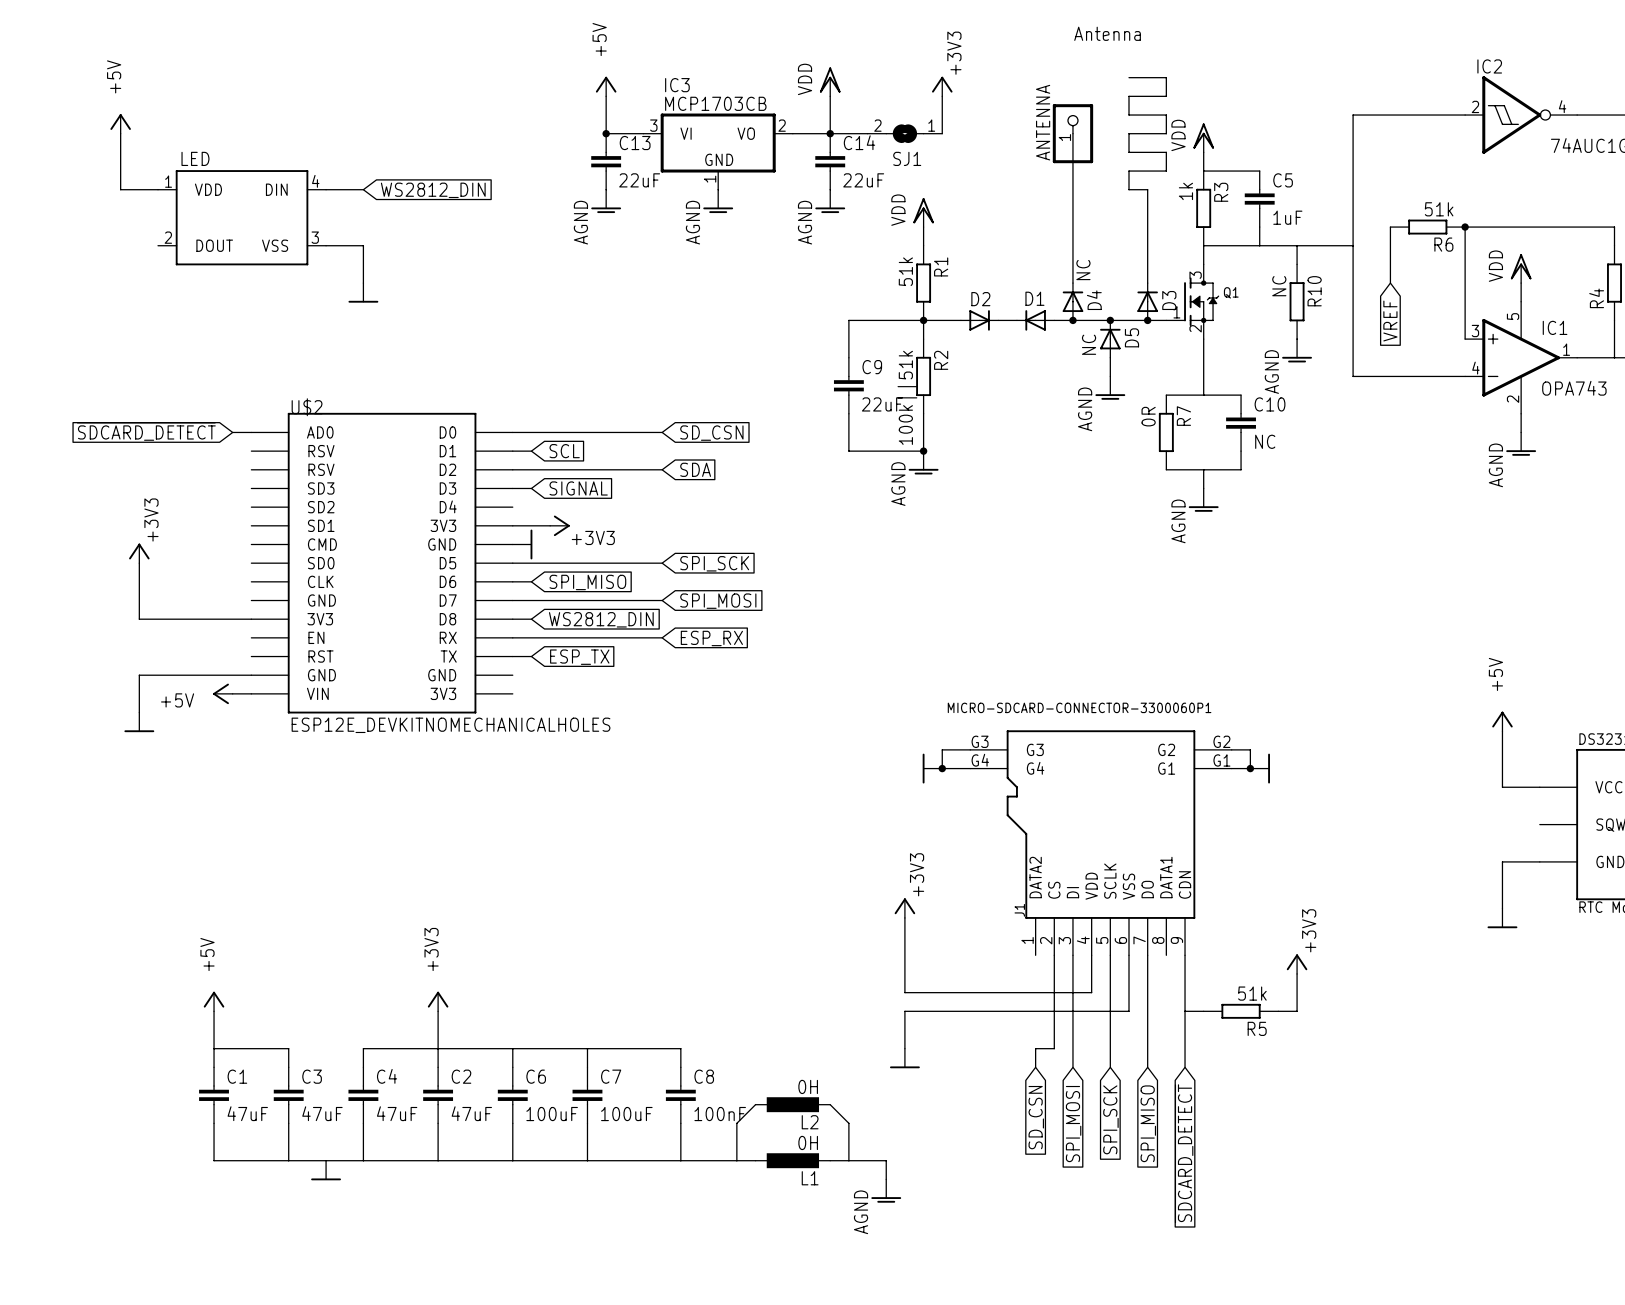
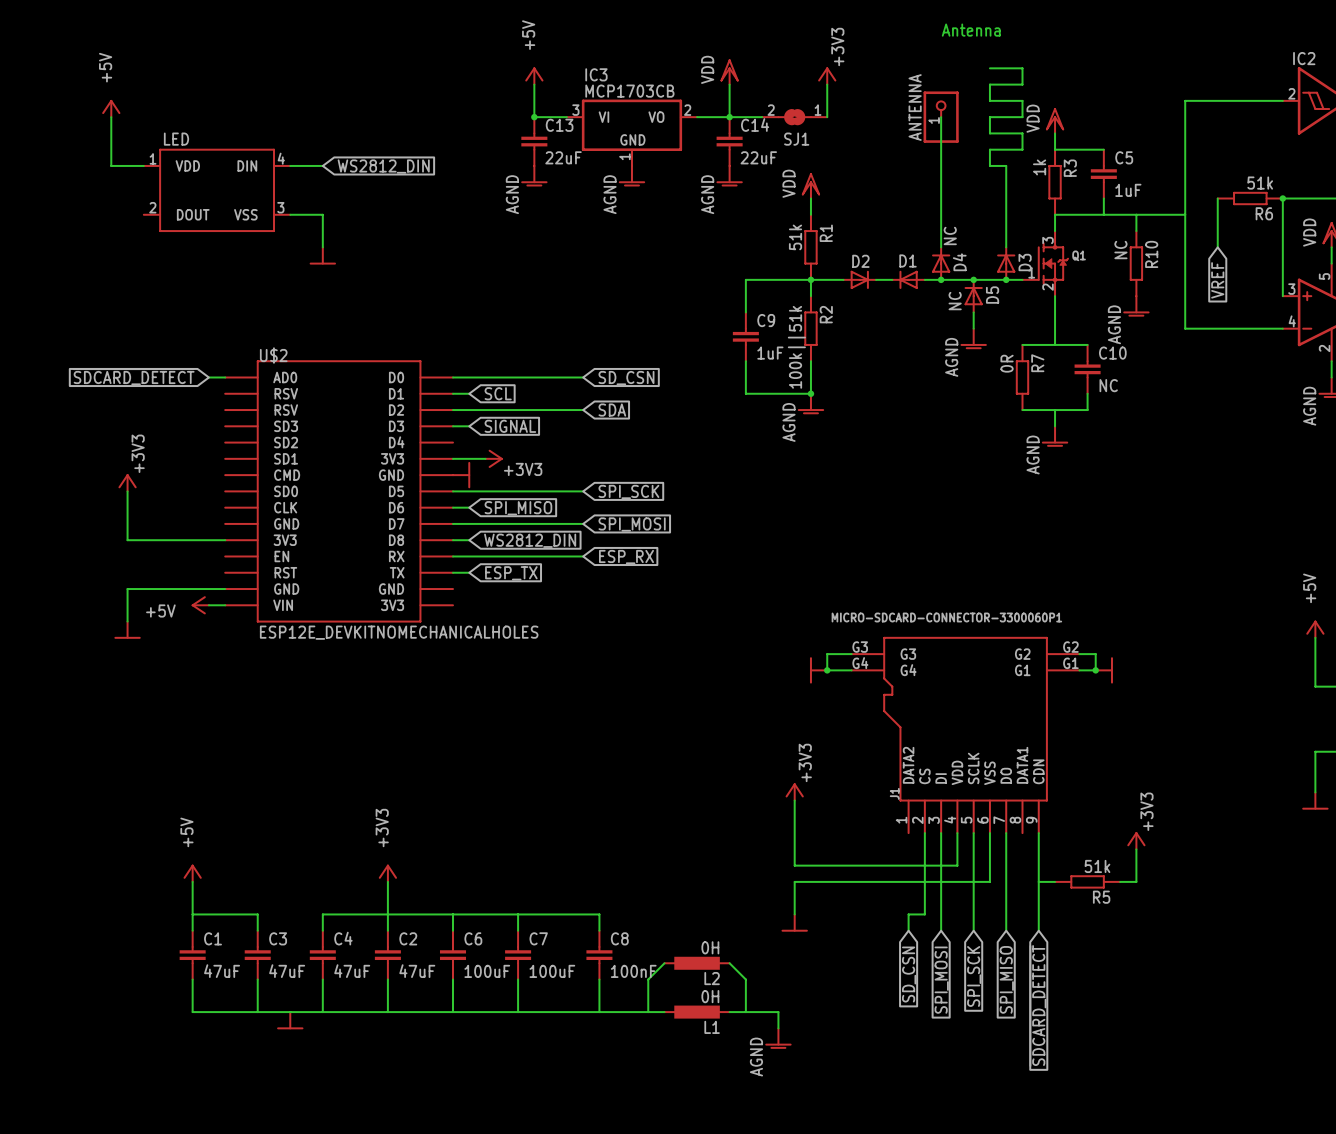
C9 value: 22uF (882, 404) -> 1uF (770, 353)

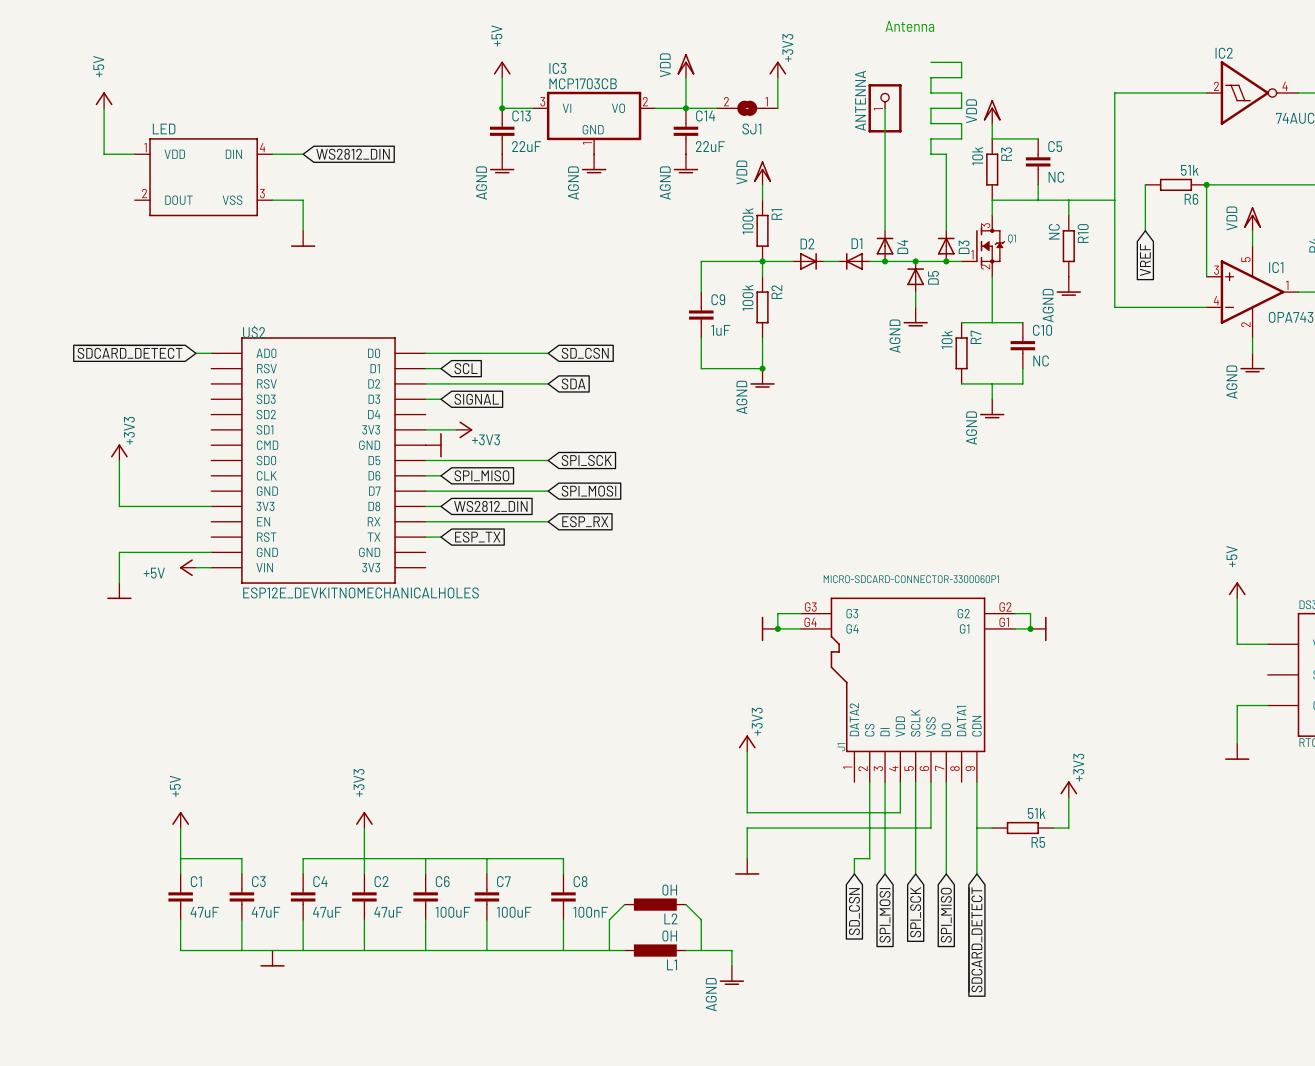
R3 value: 1k (1039, 167) -> 10k (977, 156)
C5 value: 1uF (1128, 190) -> NC (1056, 177)
D4 value: NC (950, 235) -> none
R1 value: 51k (795, 237) -> 100k (747, 221)
D5 value: NC (955, 301) -> none
R2 value: 100k||51k (796, 347) -> 100k (747, 297)
R7 value: 0R (1007, 363) -> 10k (947, 339)

